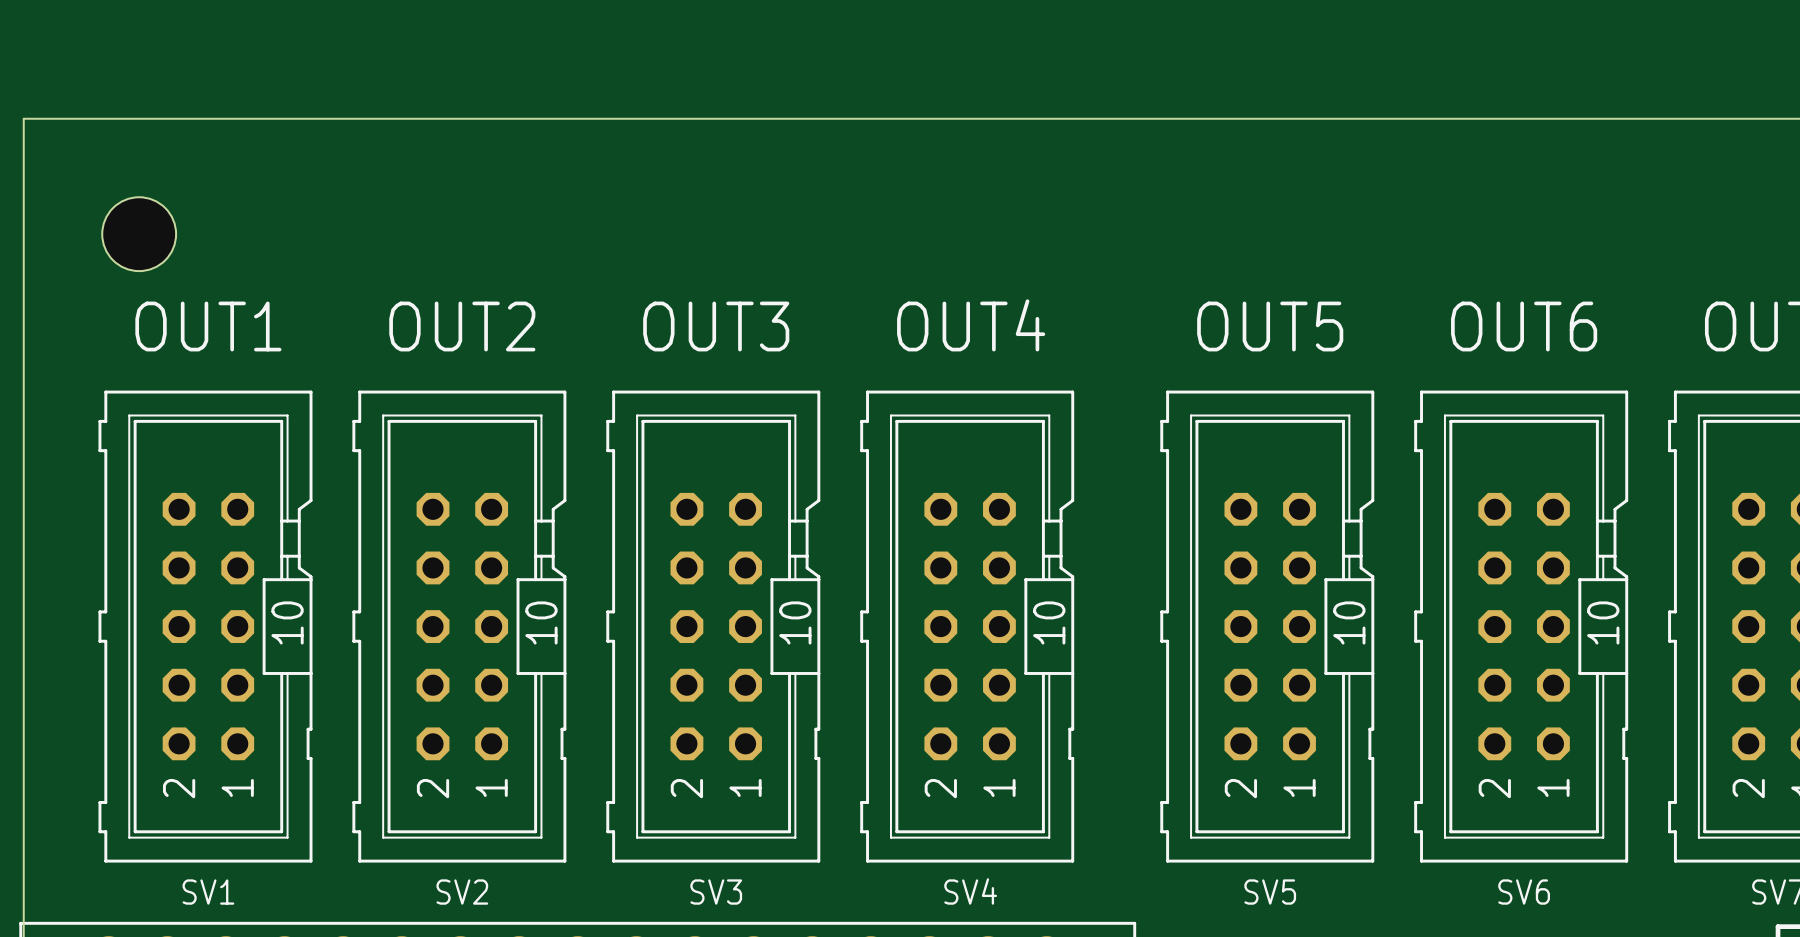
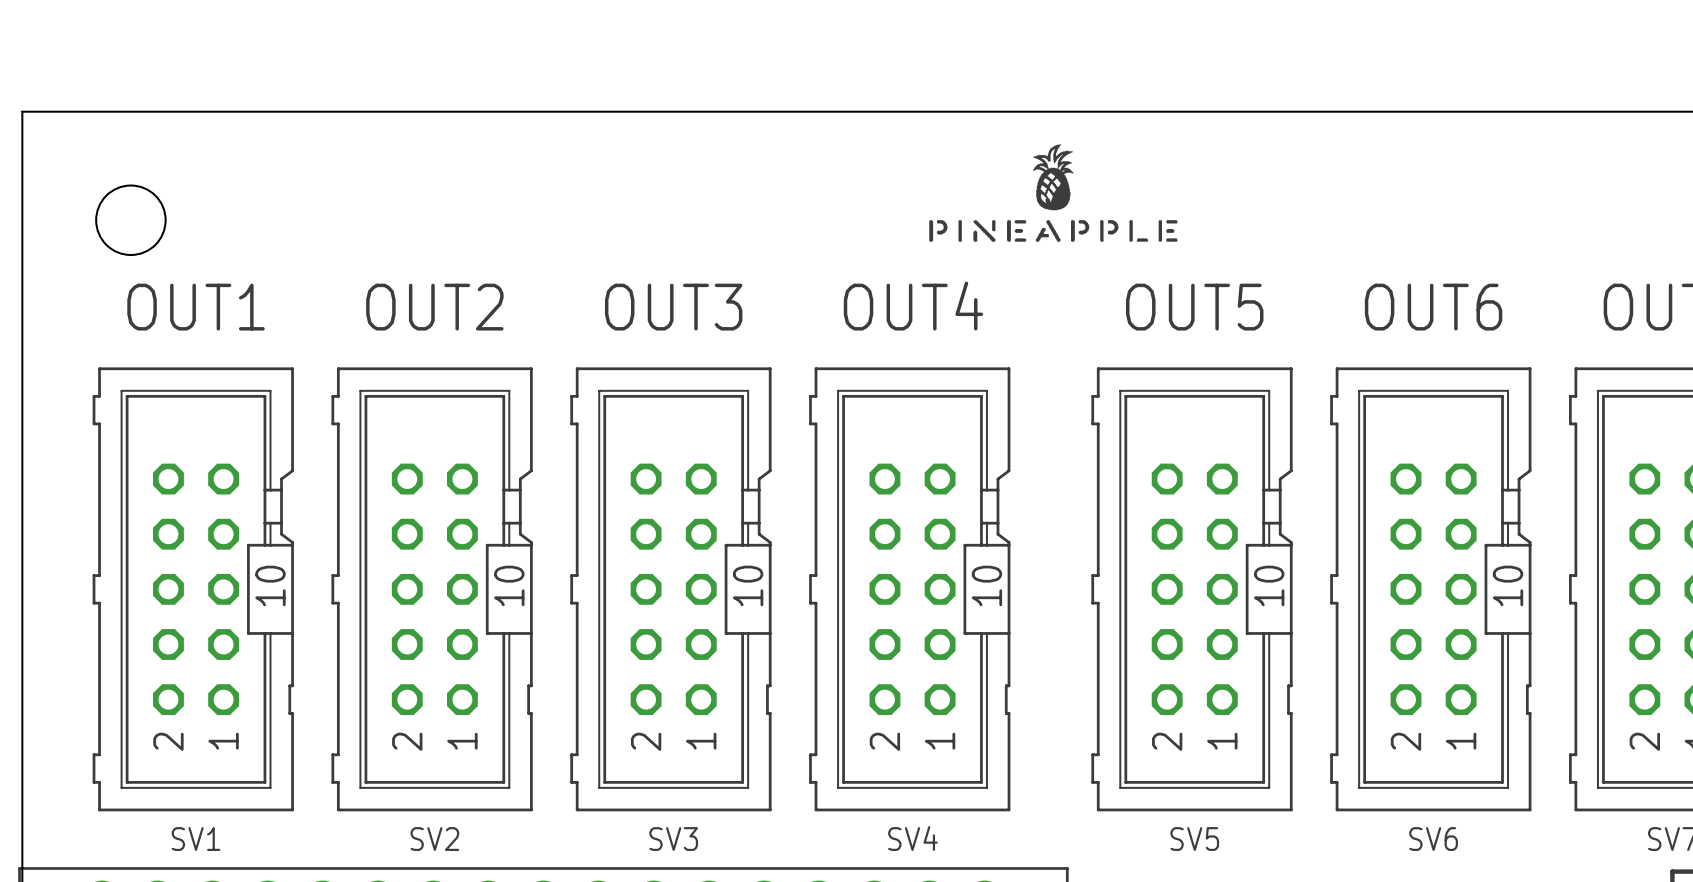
drawing: none -> [929, 144, 1178, 242]

